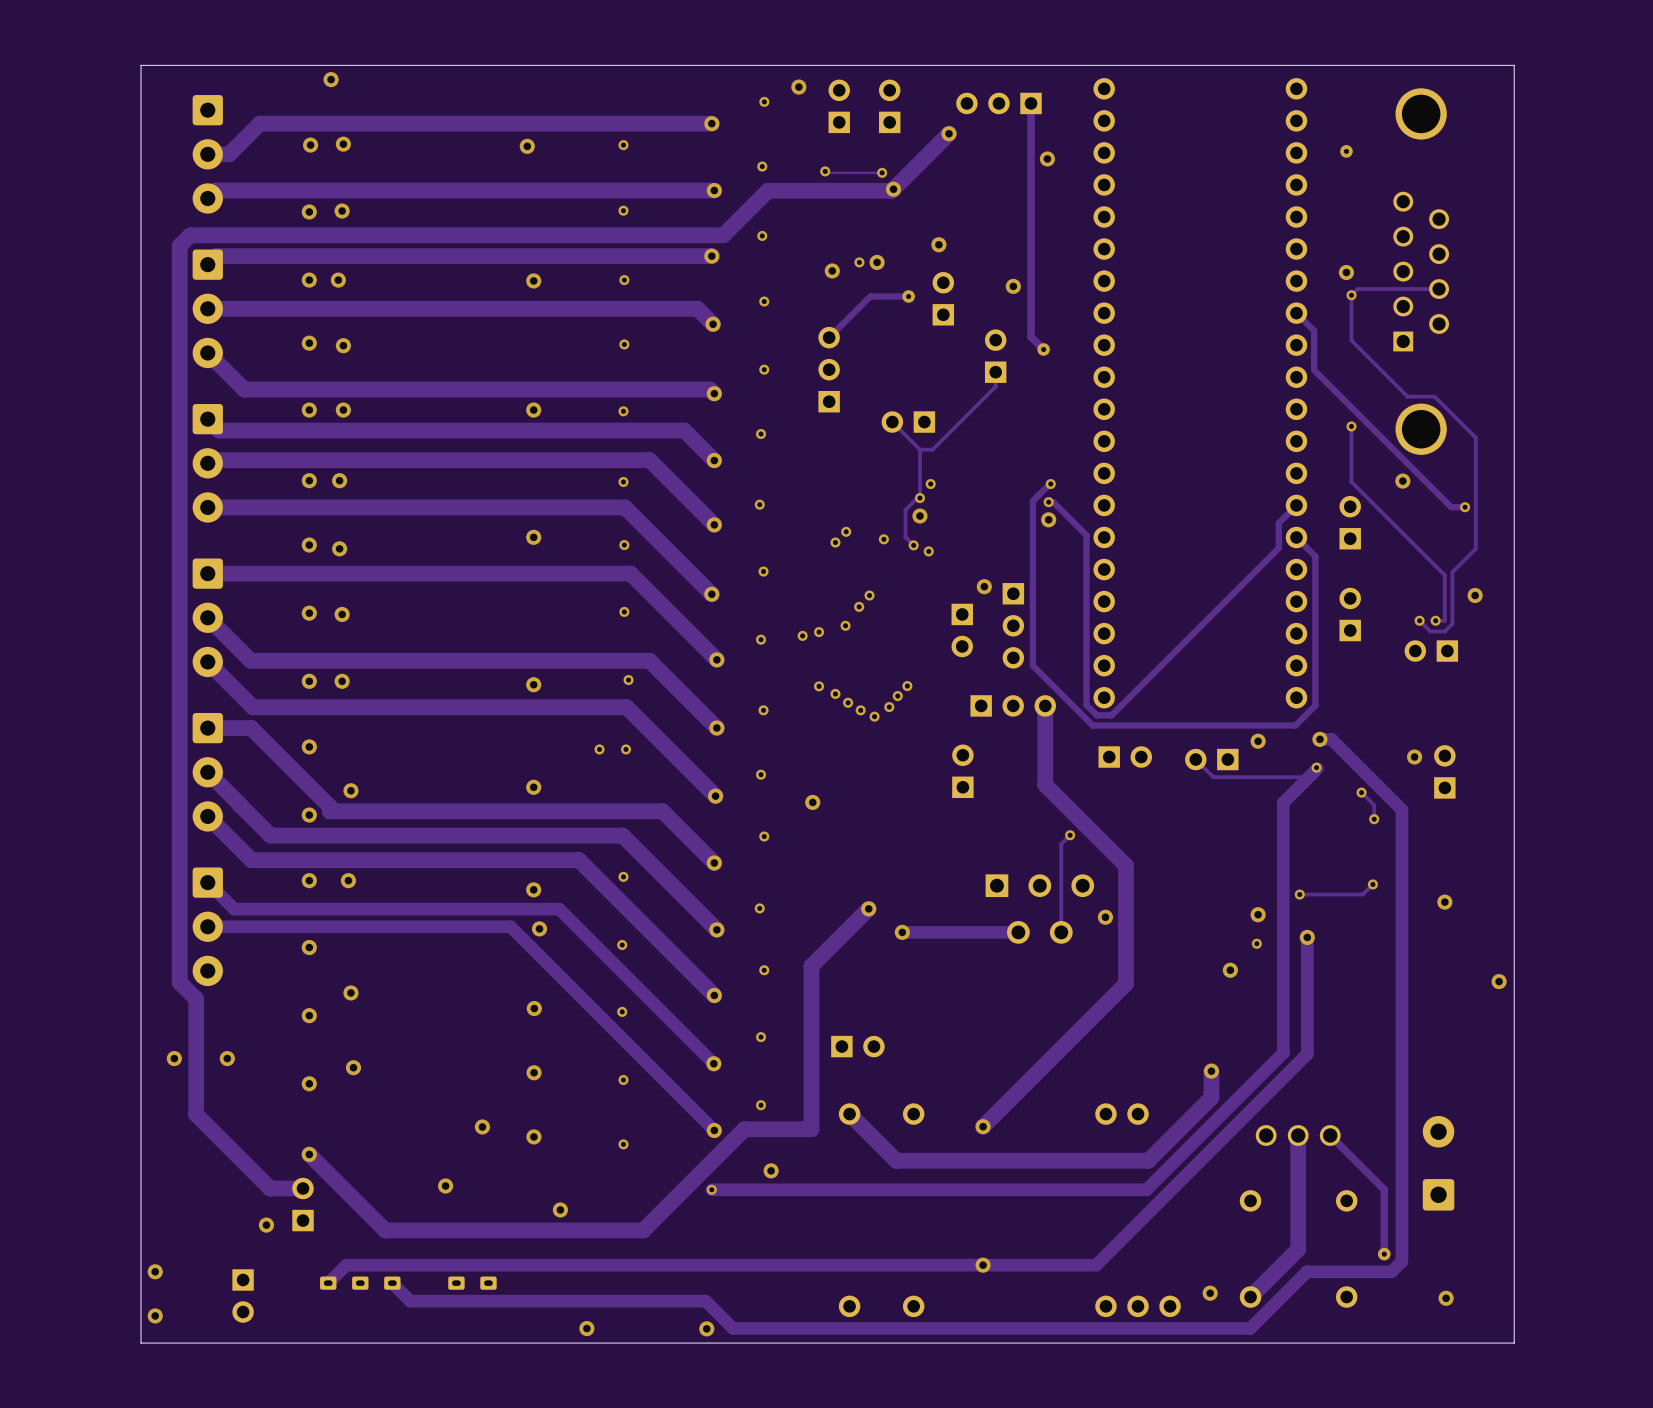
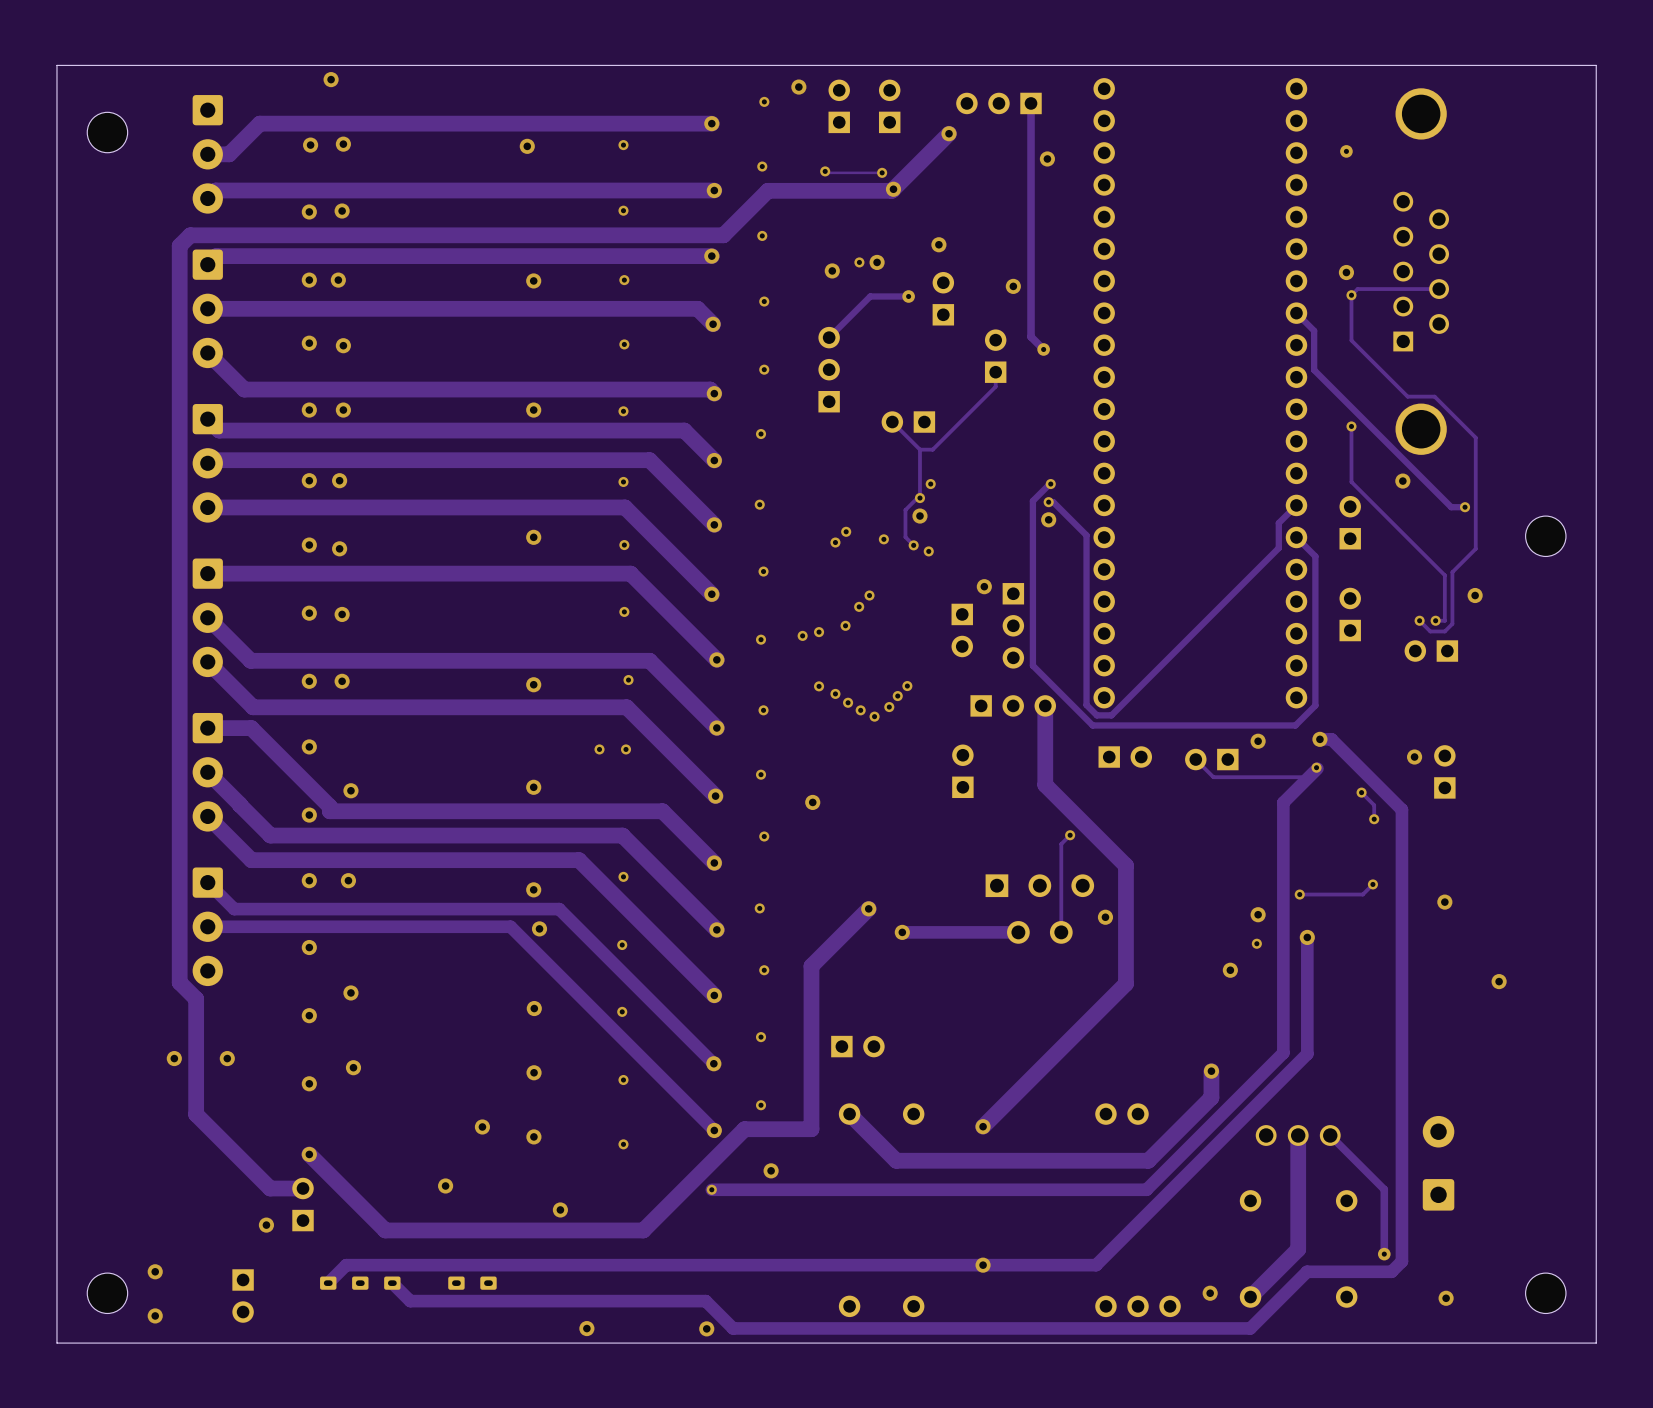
board edge: (141, 65) (141, 1343) -> (141, 65) (56, 65) (56, 1343) (141, 1343)
board edge: (1514, 65) (1514, 1343) -> (1514, 65) (1596, 65) (1596, 1343) (1514, 1343)
part: none -> (107, 132)
part: none -> (1545, 536)
part: none -> (107, 1293)
part: none -> (1545, 1293)

